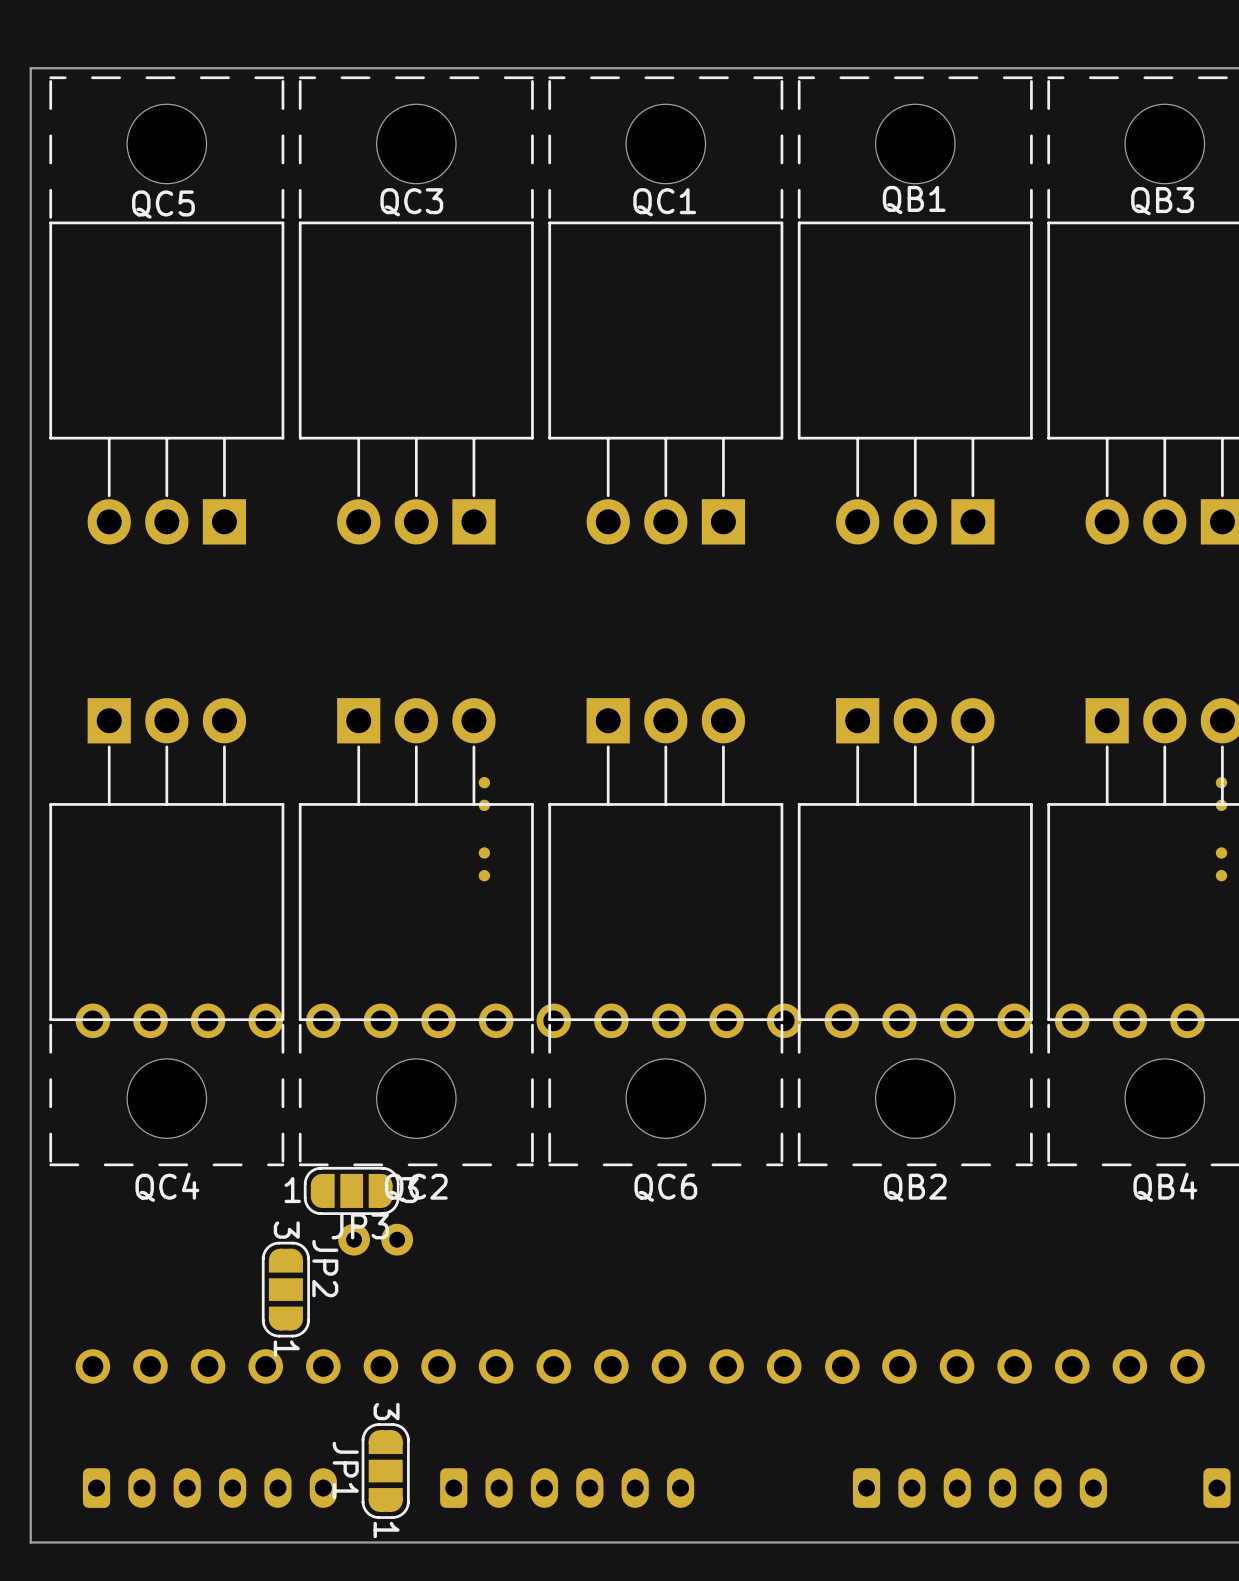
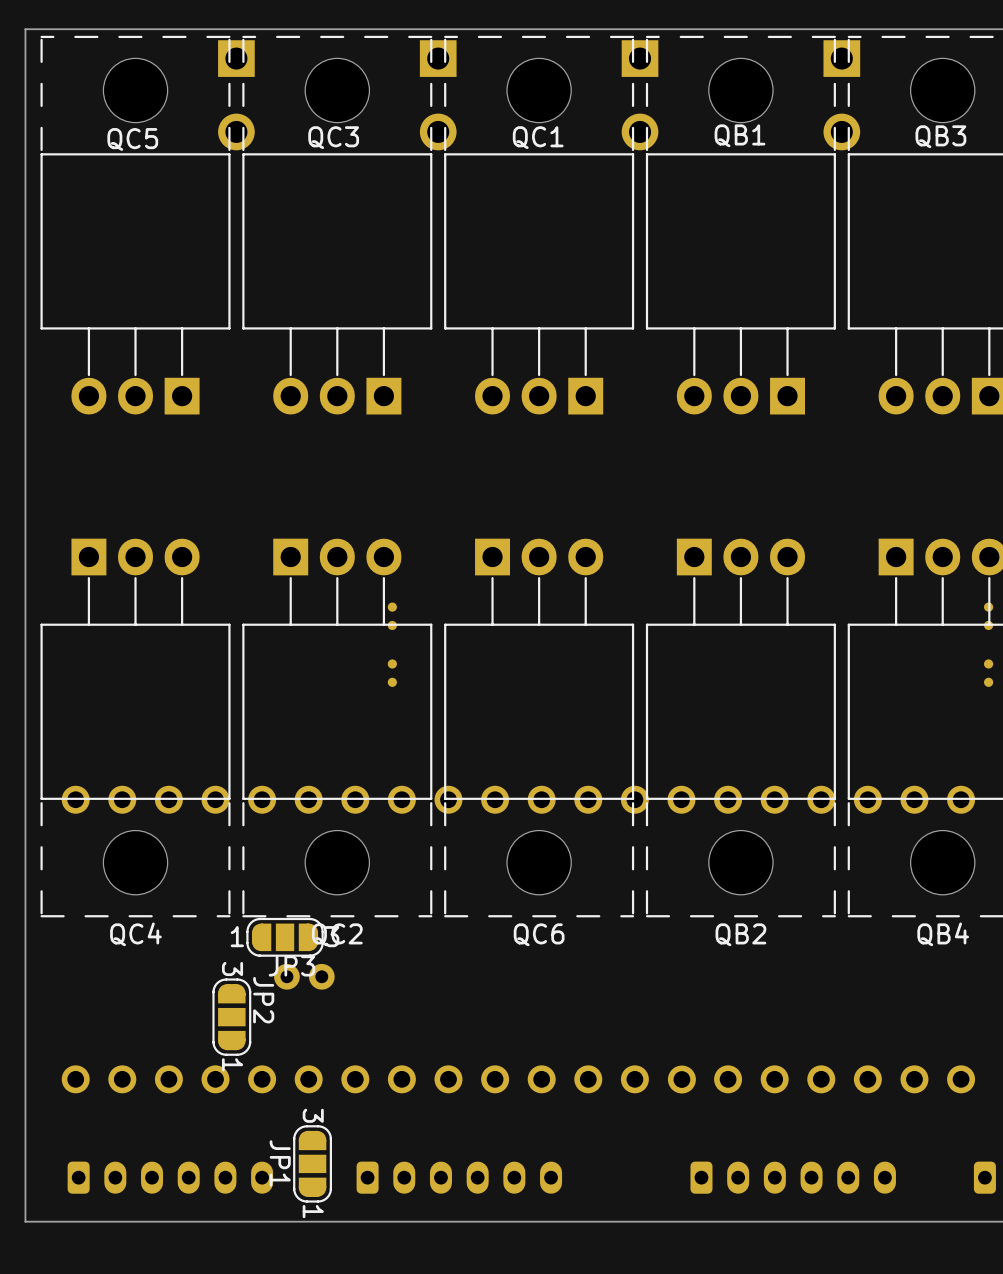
part: none -> (236, 95)
part: none -> (438, 95)
part: none -> (640, 95)
part: none -> (841, 95)

